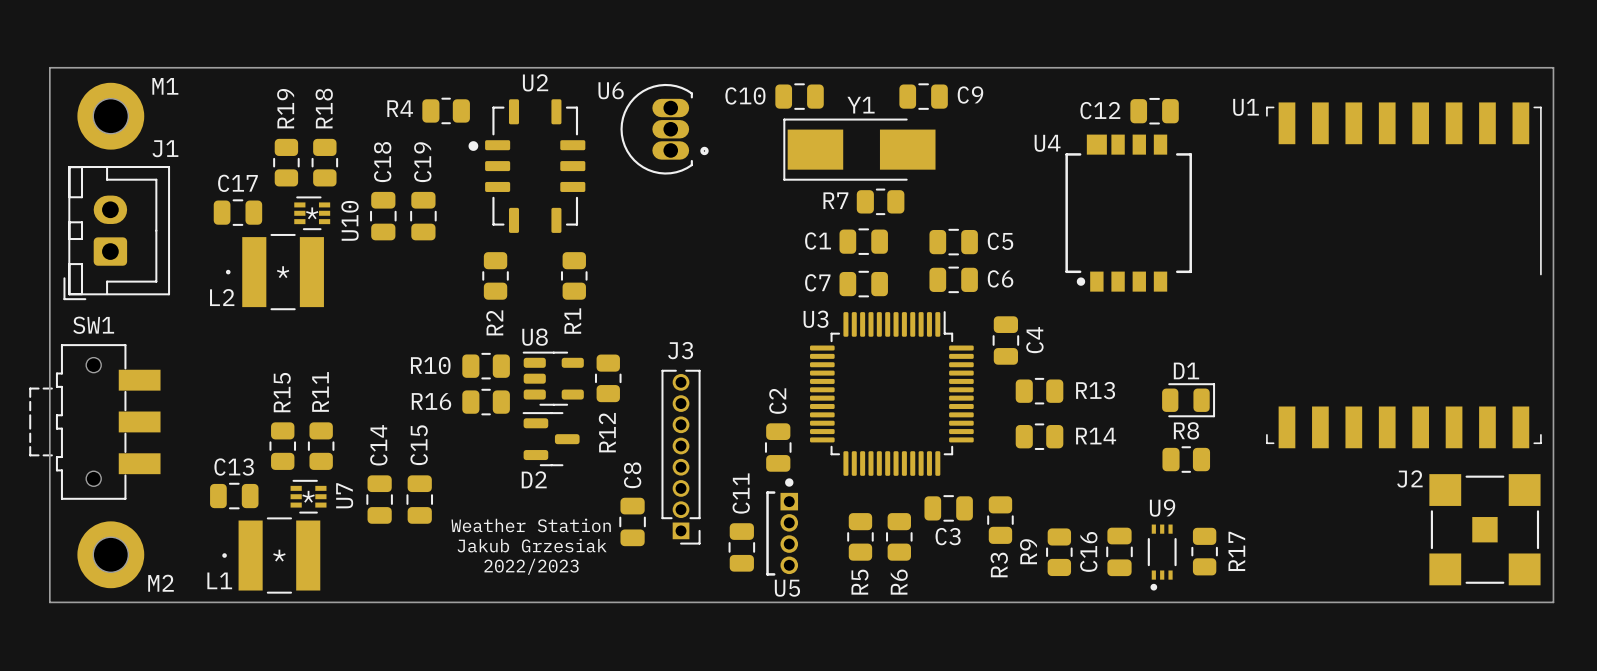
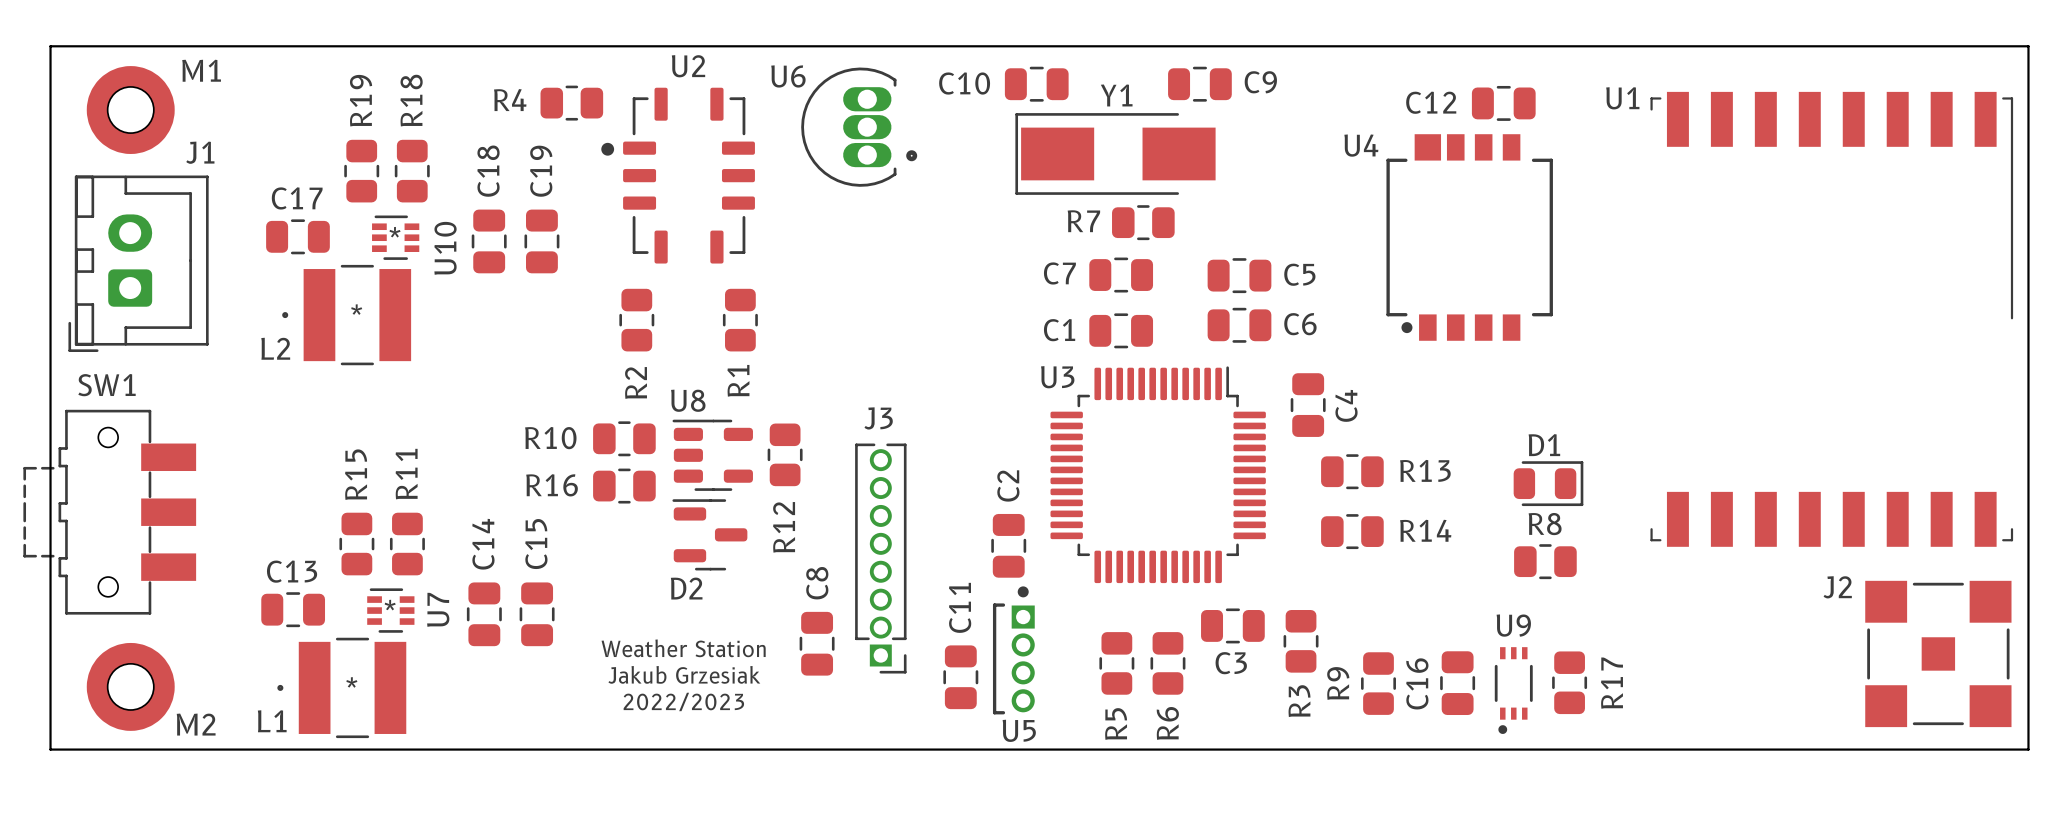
C1 name: C1 (818, 241) -> C7 (1059, 273)
C7 name: C7 (817, 282) -> C1 (1059, 330)

